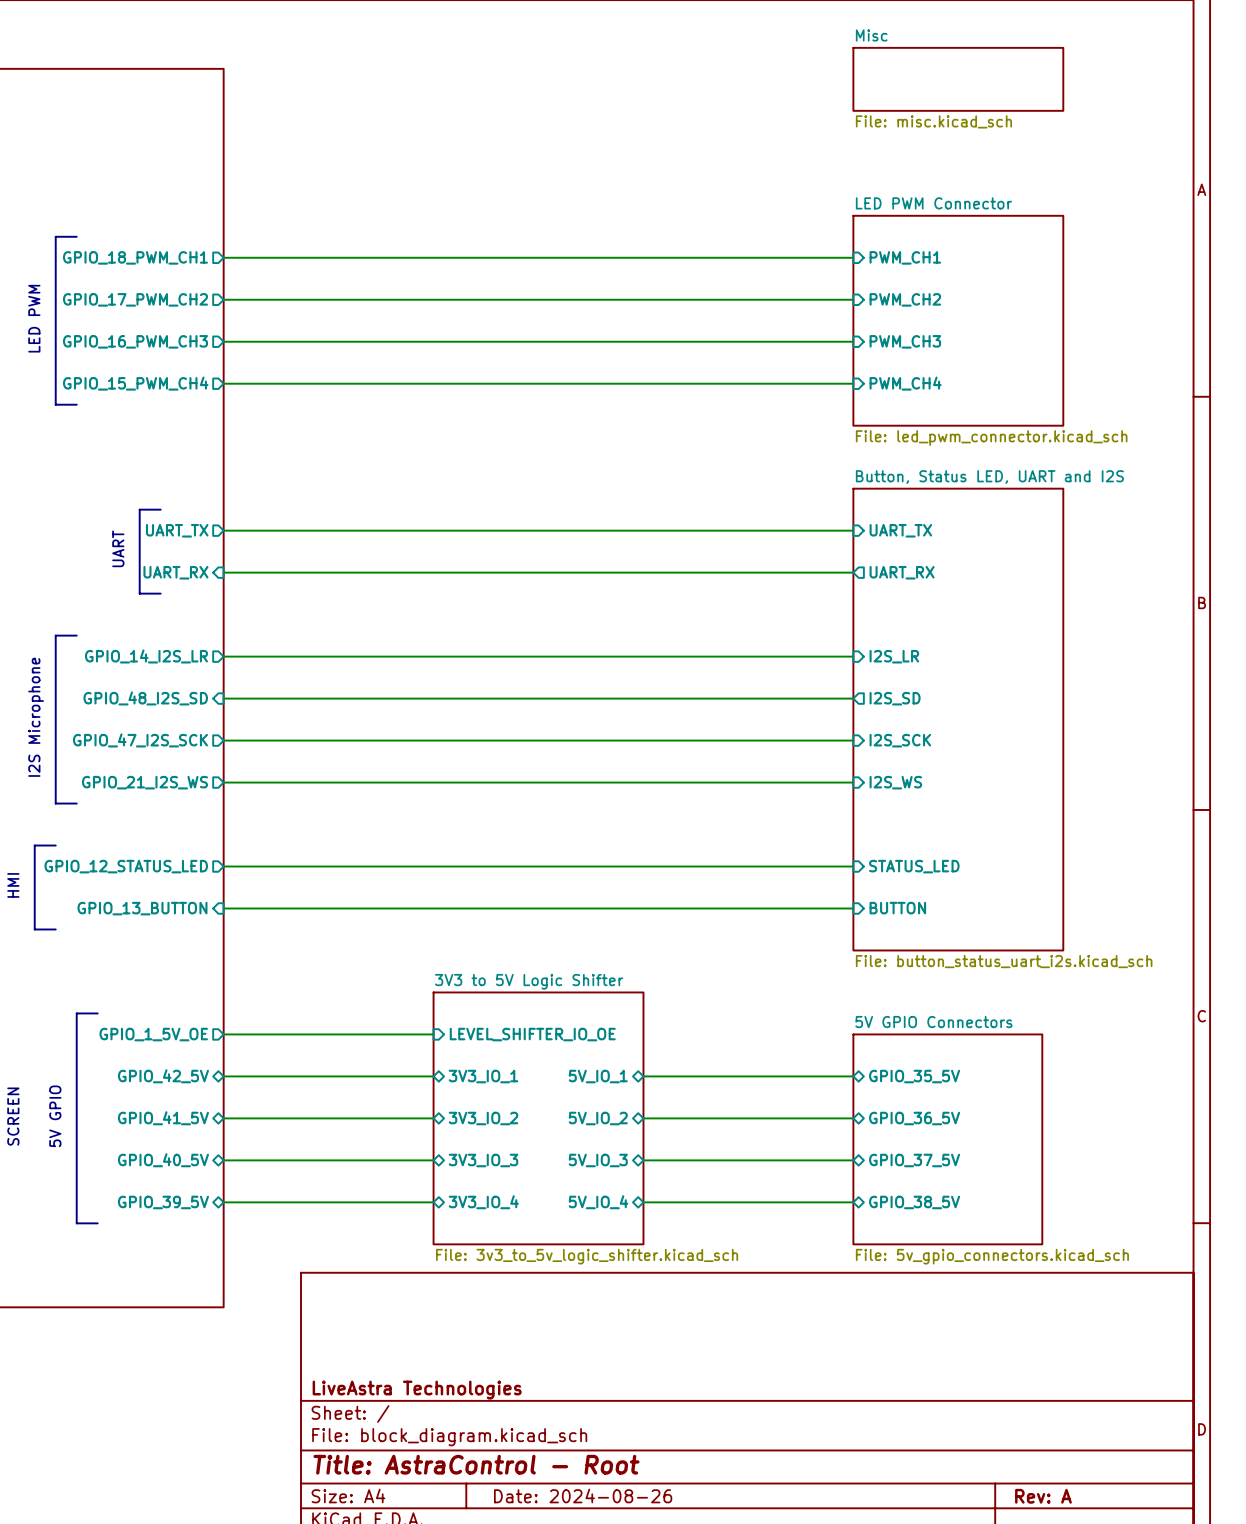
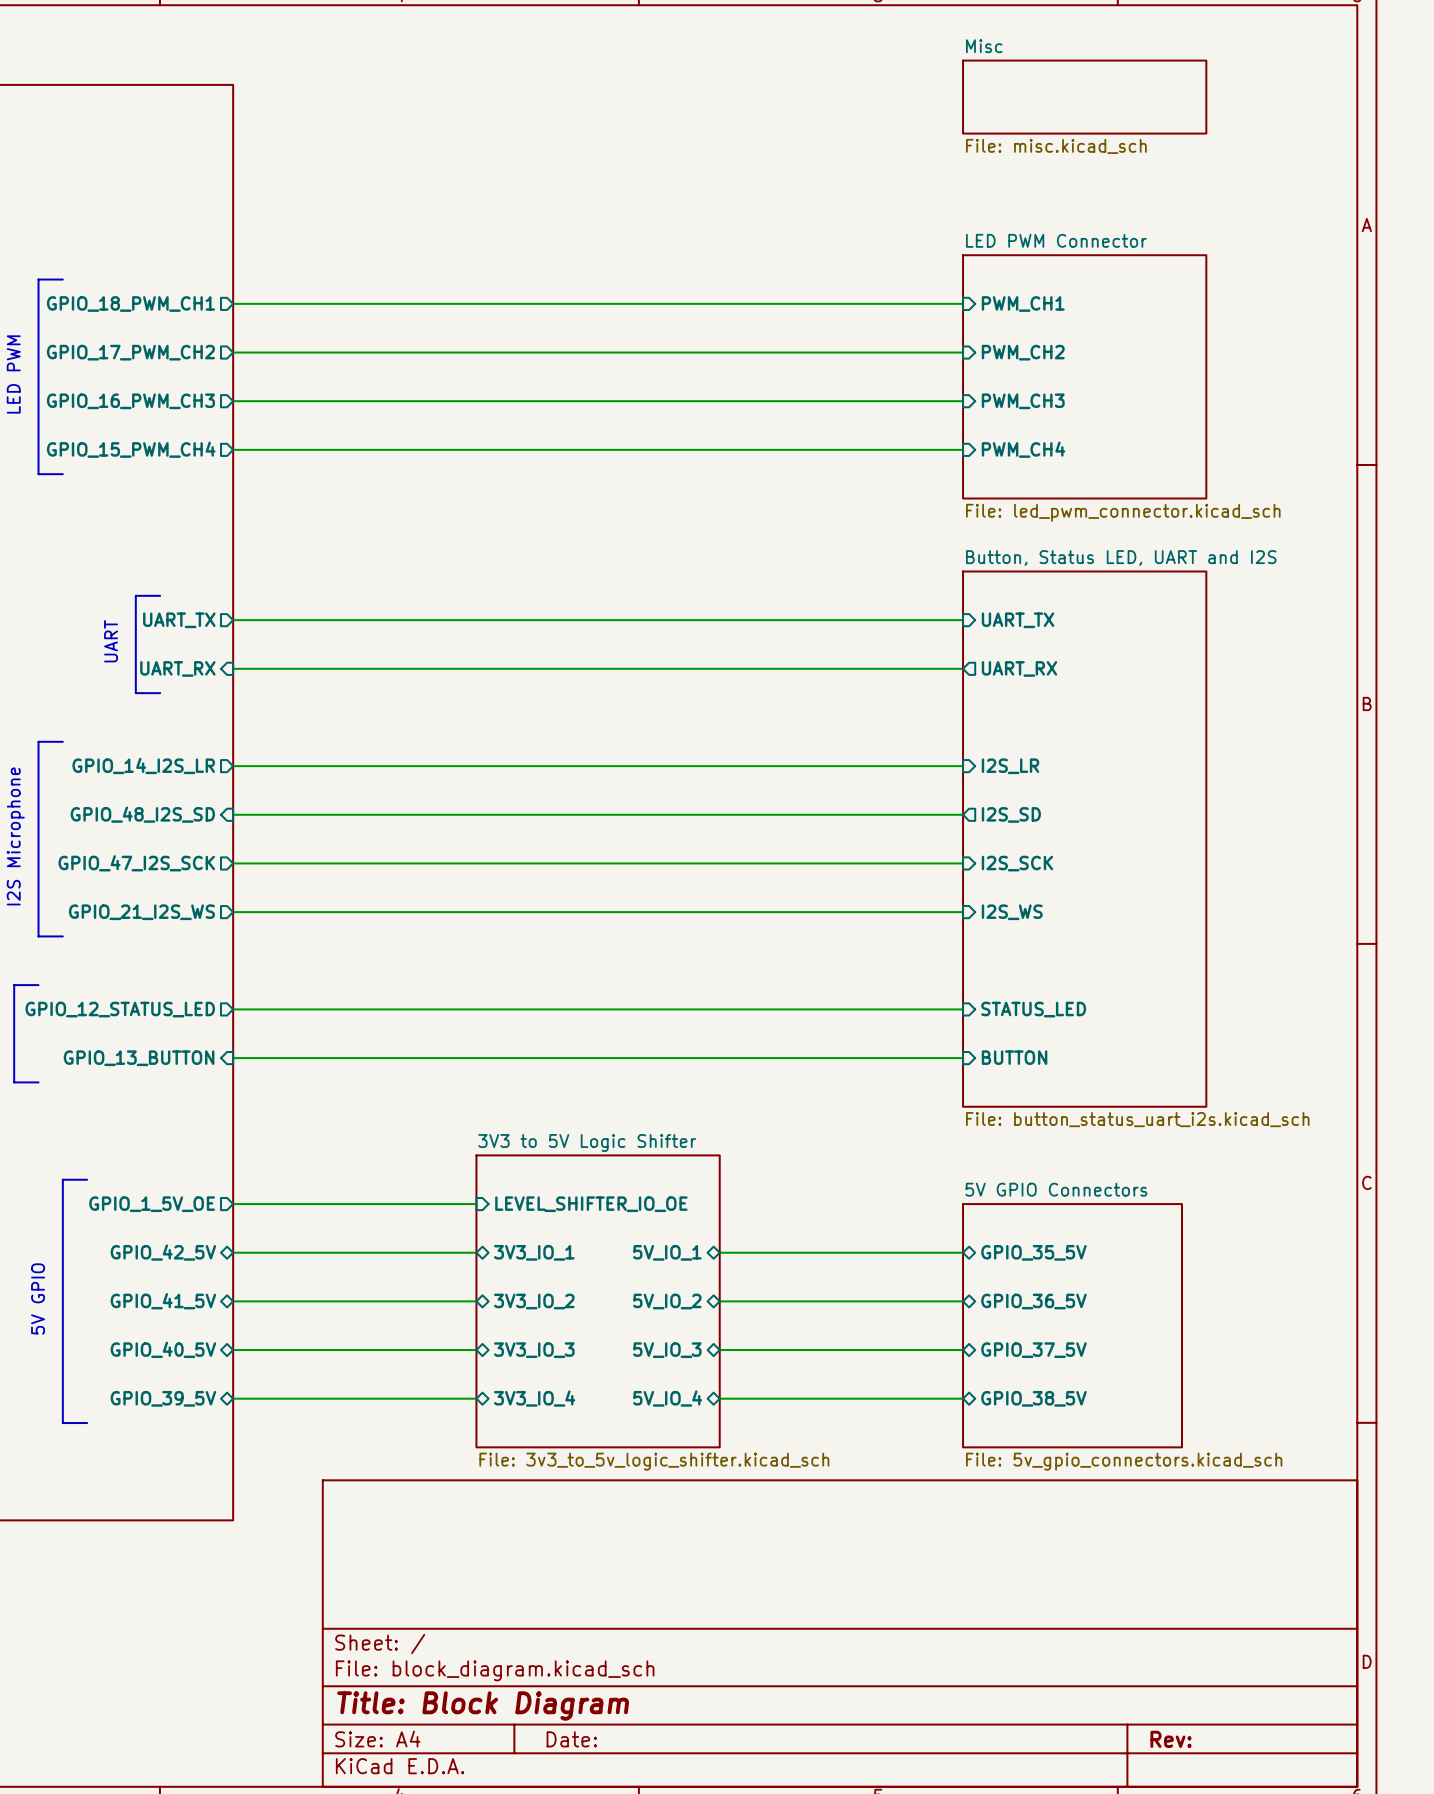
title block: LiveAstra Technologies (417, 1390) -> none
title block: Title: AstraControl - Root (476, 1464) -> Title: Block Diagram (483, 1705)
title block: Date: 2024-08-26 (583, 1495) -> Date: (571, 1739)
title block: Rev: A (1043, 1496) -> Rev: (1171, 1739)

